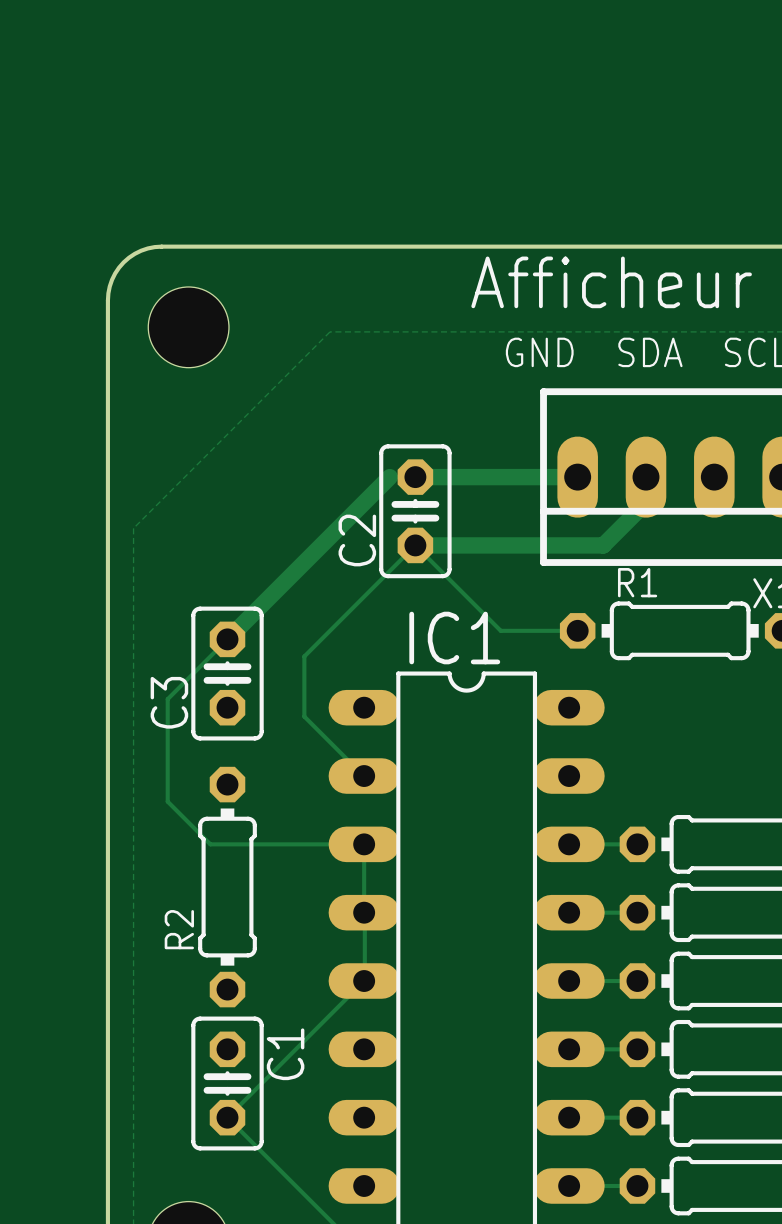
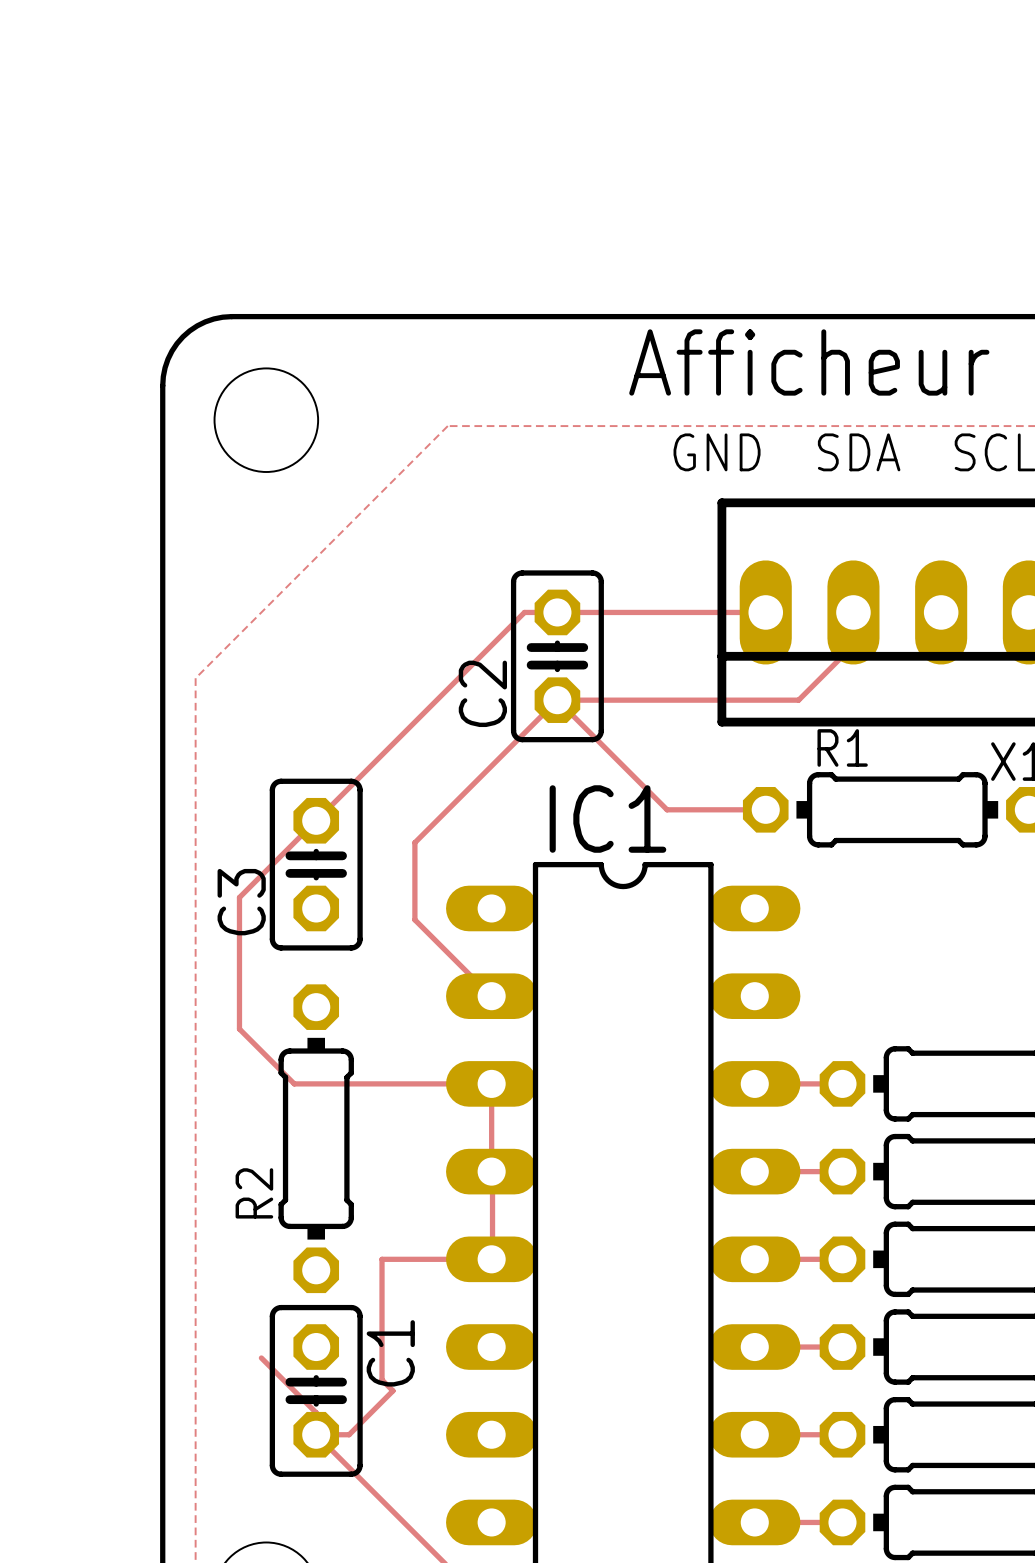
track width: thick (389, 477) (227, 639) -> thin (524, 612) (316, 820)
track width: thick (415, 477) (577, 477) -> thin (557, 612) (765, 612)
track width: thick (646, 502) (603, 545) (415, 545) -> thin (853, 645) (798, 700) (557, 700)
track: (364, 981) (227, 1117) -> (491, 1259) (382, 1259) (382, 1379) (392, 1390) (349, 1434) (316, 1434) (316, 1412) (261, 1357)

